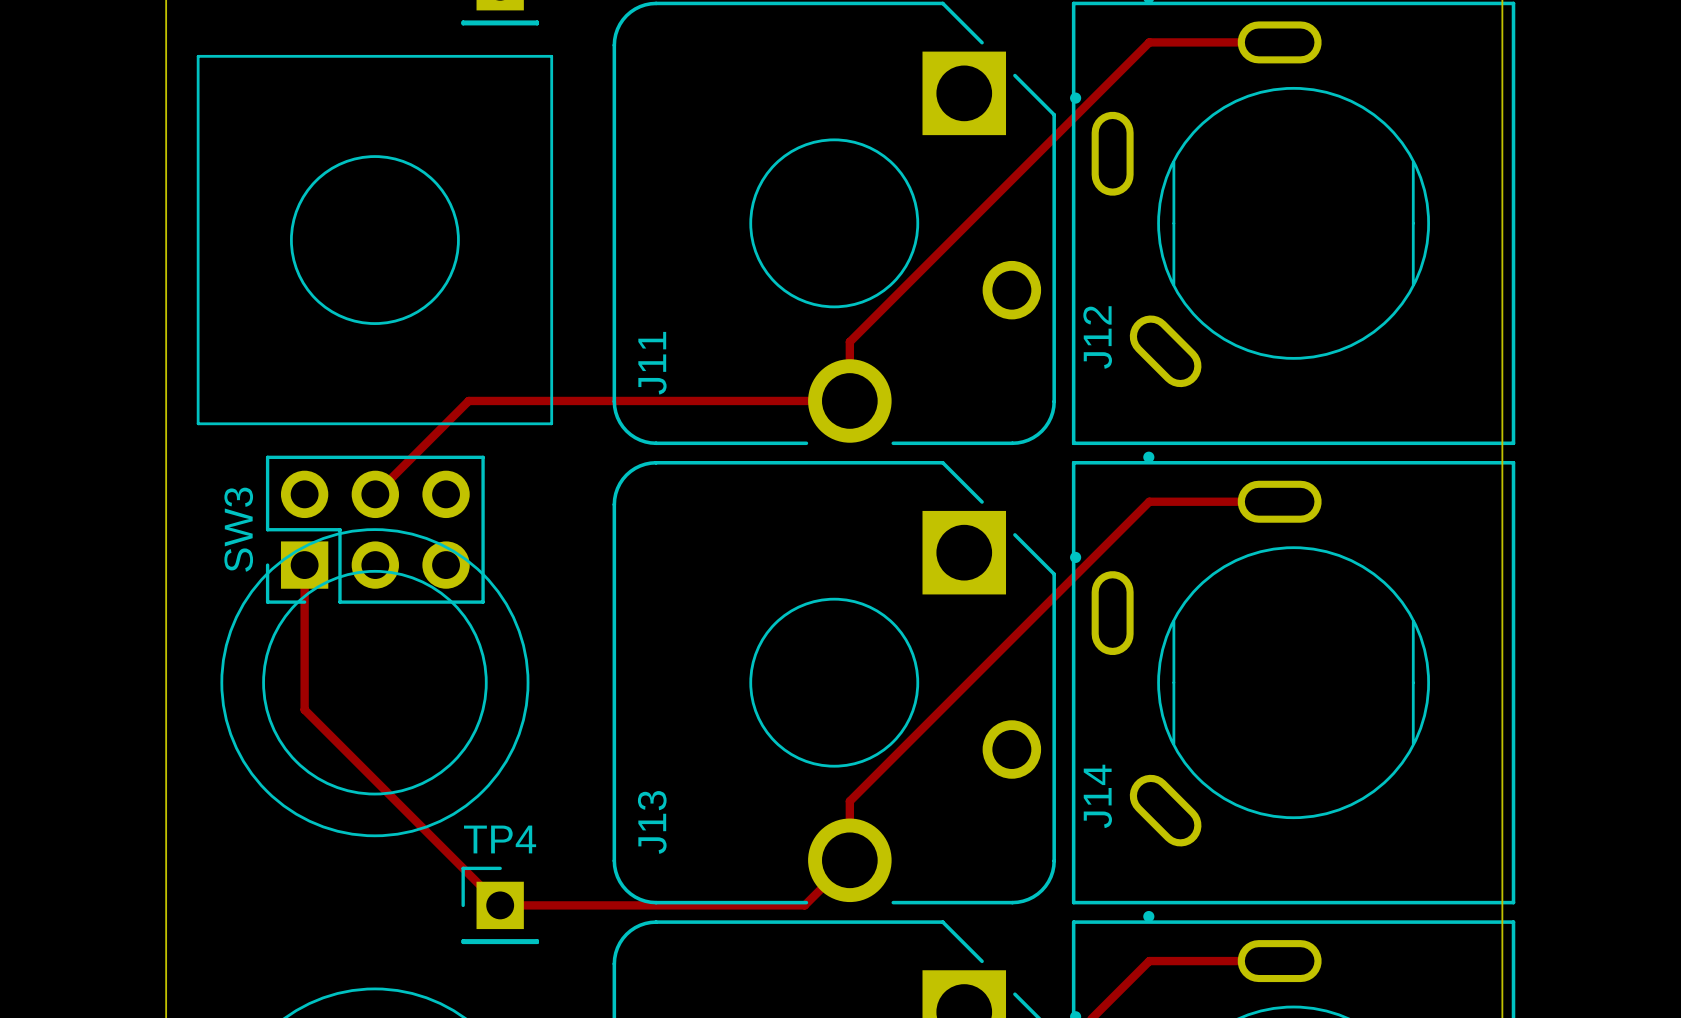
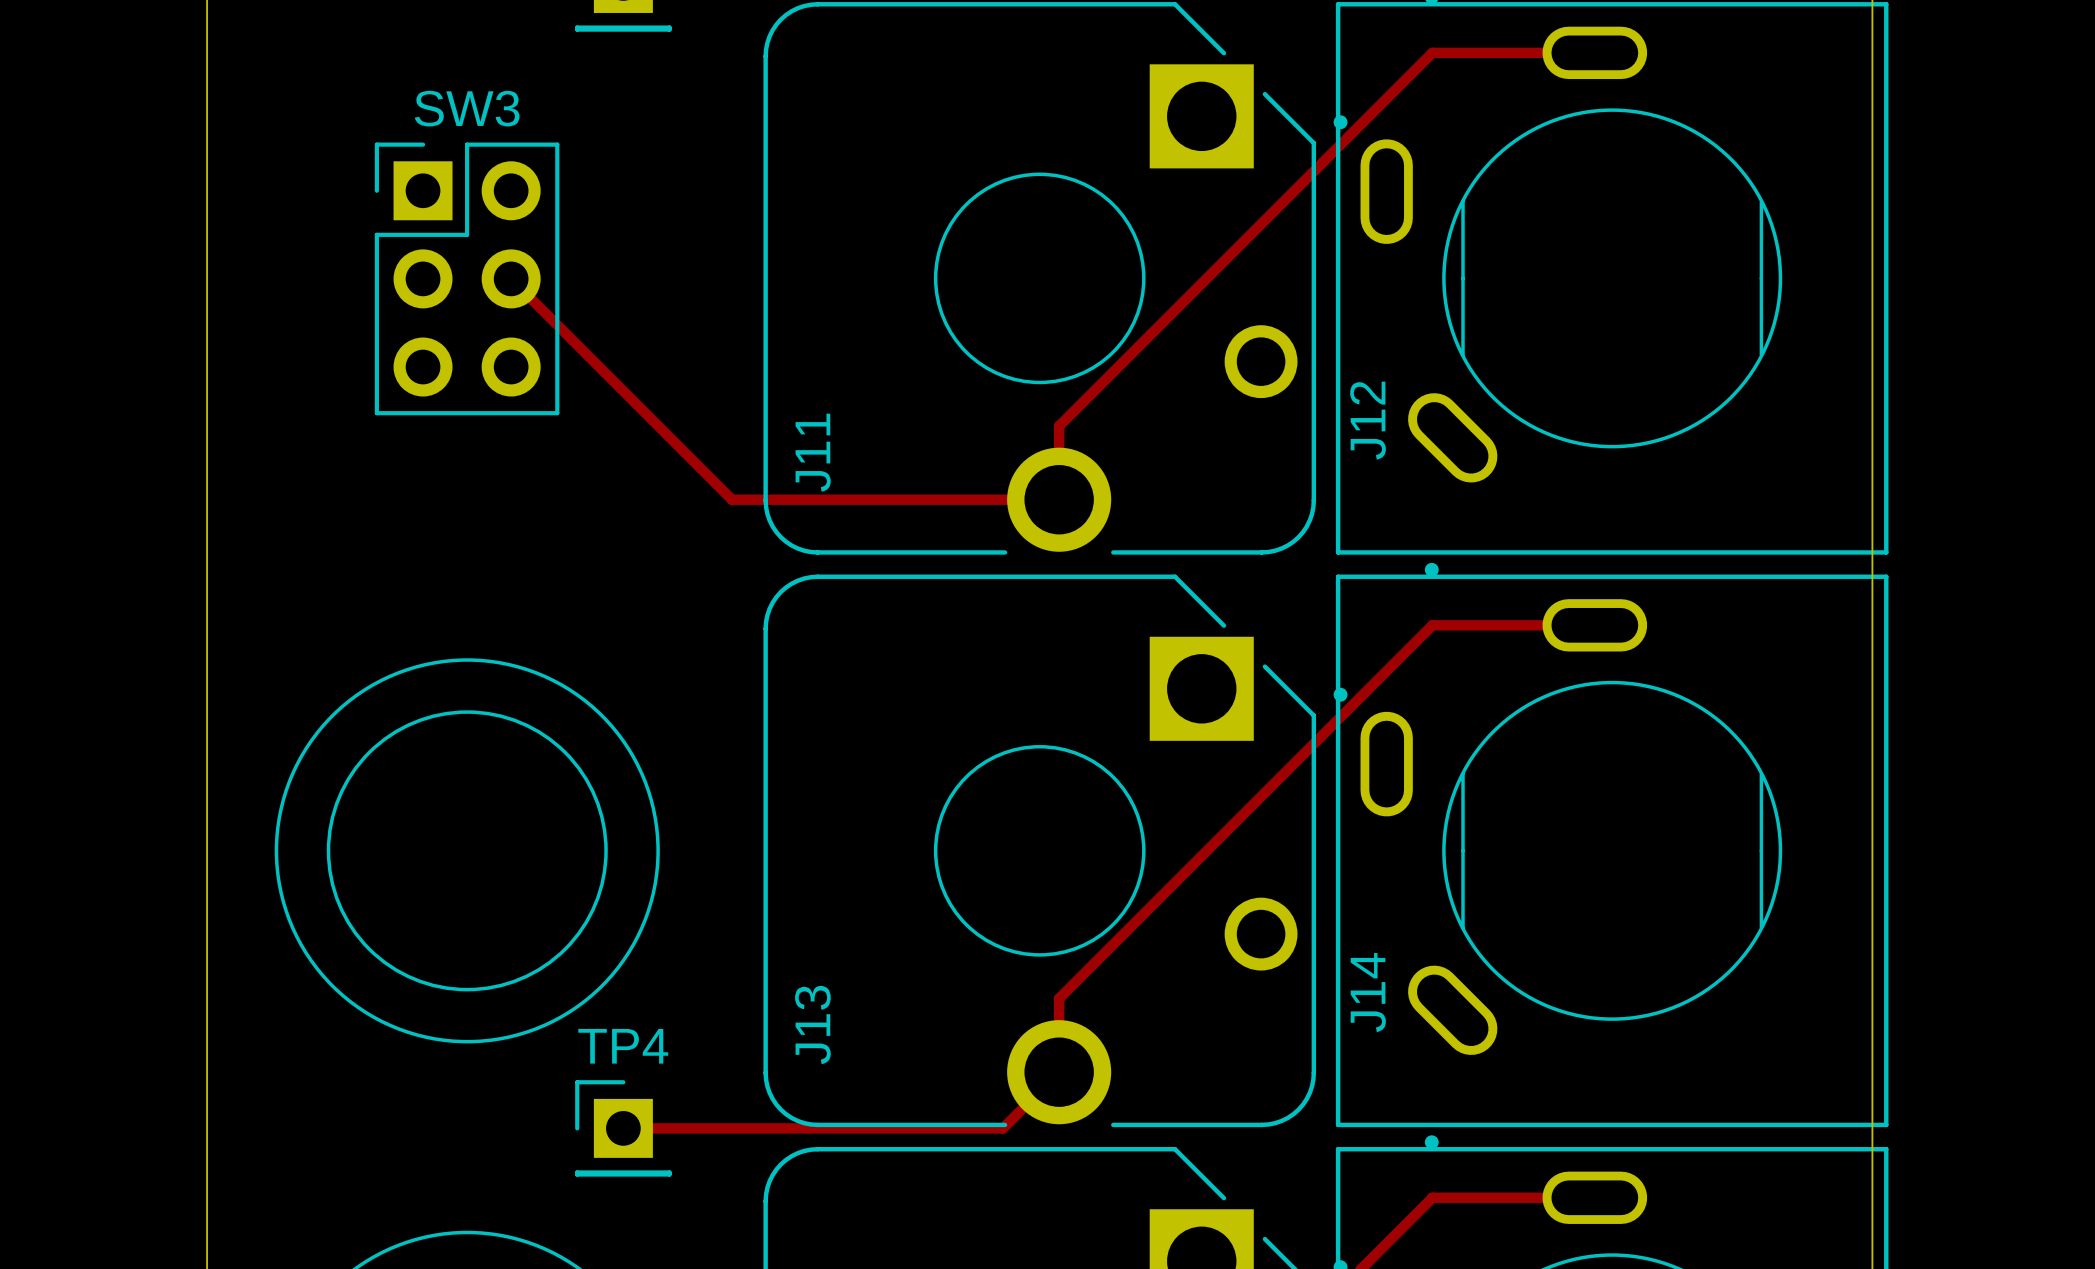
line: (198, 56) (551, 56) (551, 423) (198, 423) (198, 56) -> none
drawing: [290, 155, 460, 325] -> none
track: (587, 400) (468, 400) (375, 494) -> (731, 499) (511, 278)
SW3 rotation: 0° (375, 529) -> 90° clockwise (467, 278)
SW3 position: (375, 529) -> (467, 278)
track: (304, 565) (304, 709) (500, 905) -> none

